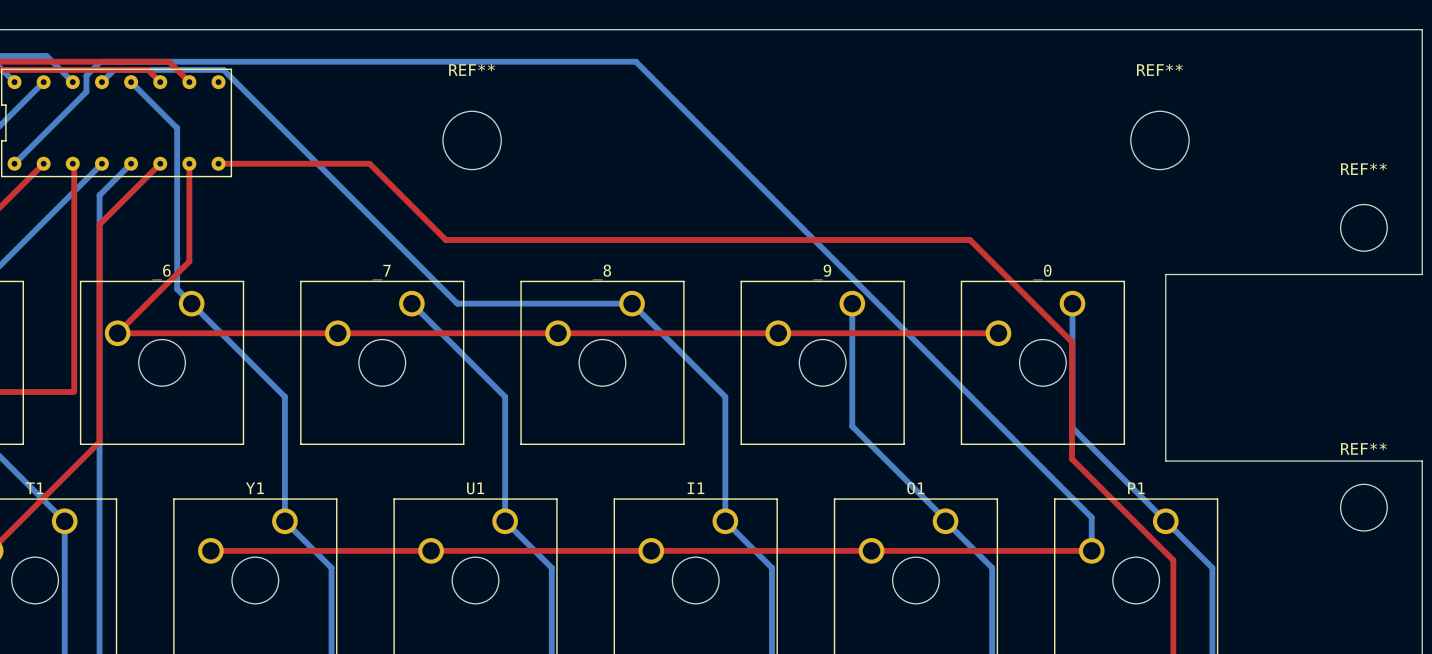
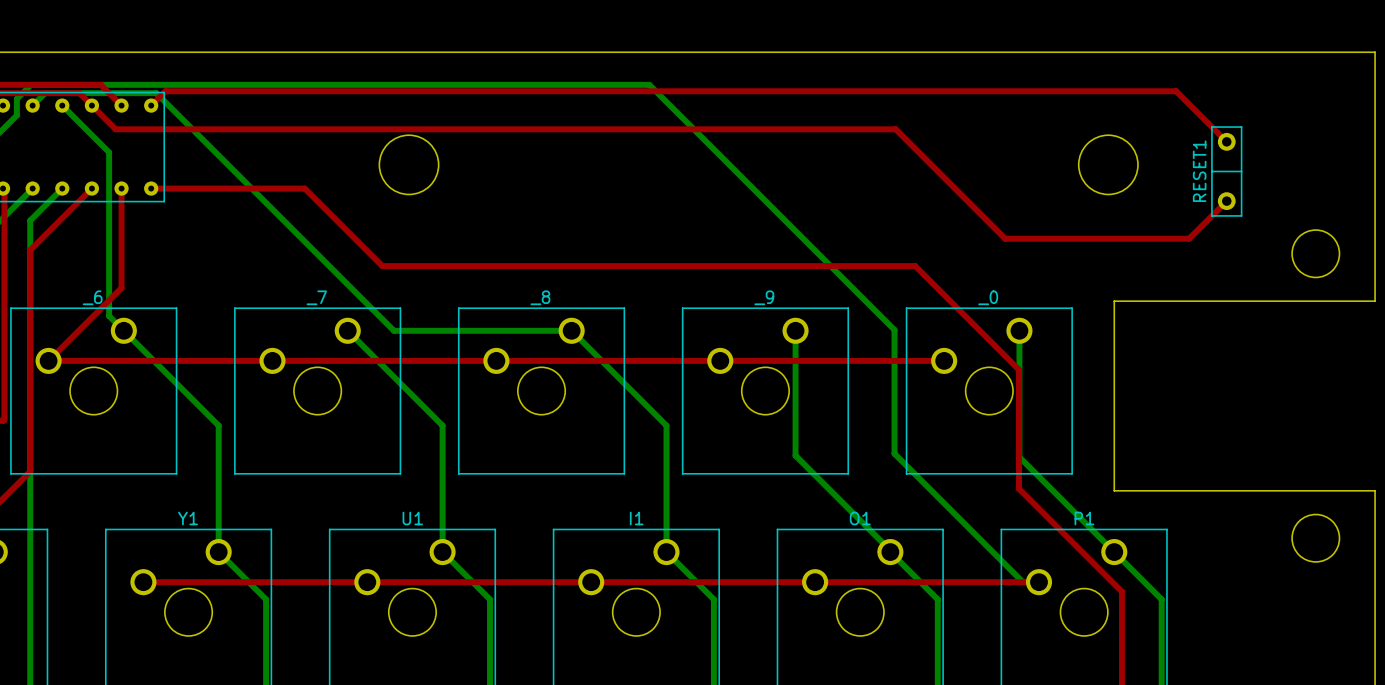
bottom track: (635, 61) (1091, 517) (1091, 550) -> (575, 84) (649, 84) (894, 329) (894, 453) (1022, 582) (1039, 582)
REF** name: REF** (472, 69) -> none
REF** name: REF** (1159, 69) -> none
top track: none -> (91, 105) (115, 129) (895, 129) (1005, 238) (1189, 238) (1226, 201)
top track: none -> (151, 105) (165, 91) (1176, 91) (1226, 141)
RESET1: none -> (1226, 171)
REF** name: REF** (1363, 169) -> none
REF** name: REF** (1363, 448) -> none

